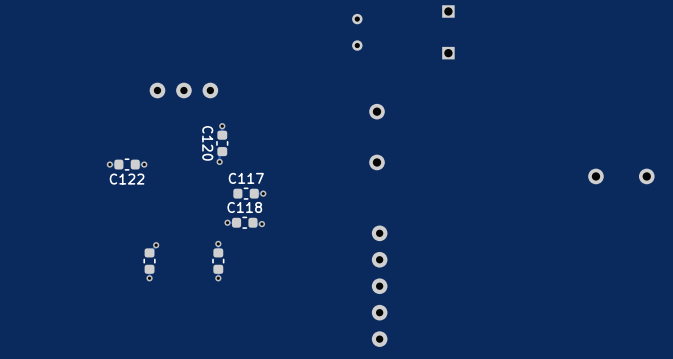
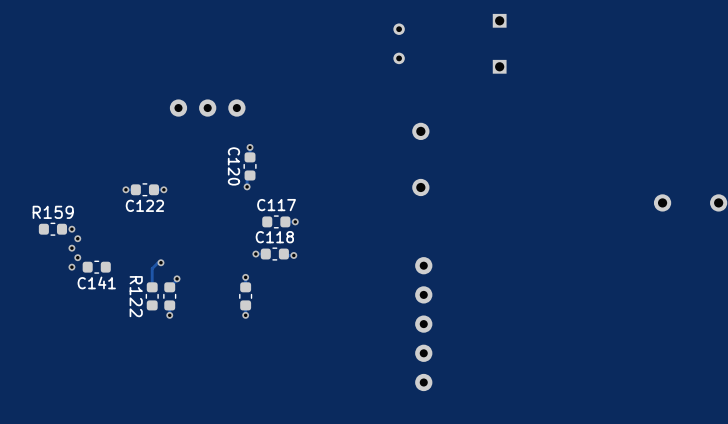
R159: none -> (52, 229)
via: none -> (71, 229)
via: none -> (77, 238)
via: none -> (71, 248)
via: none -> (77, 257)
via: none -> (160, 262)
track: none -> (162, 262) (158, 262) (152, 268) (152, 287)
via: none -> (71, 267)
C141: none -> (96, 267)
R122: none -> (152, 296)

